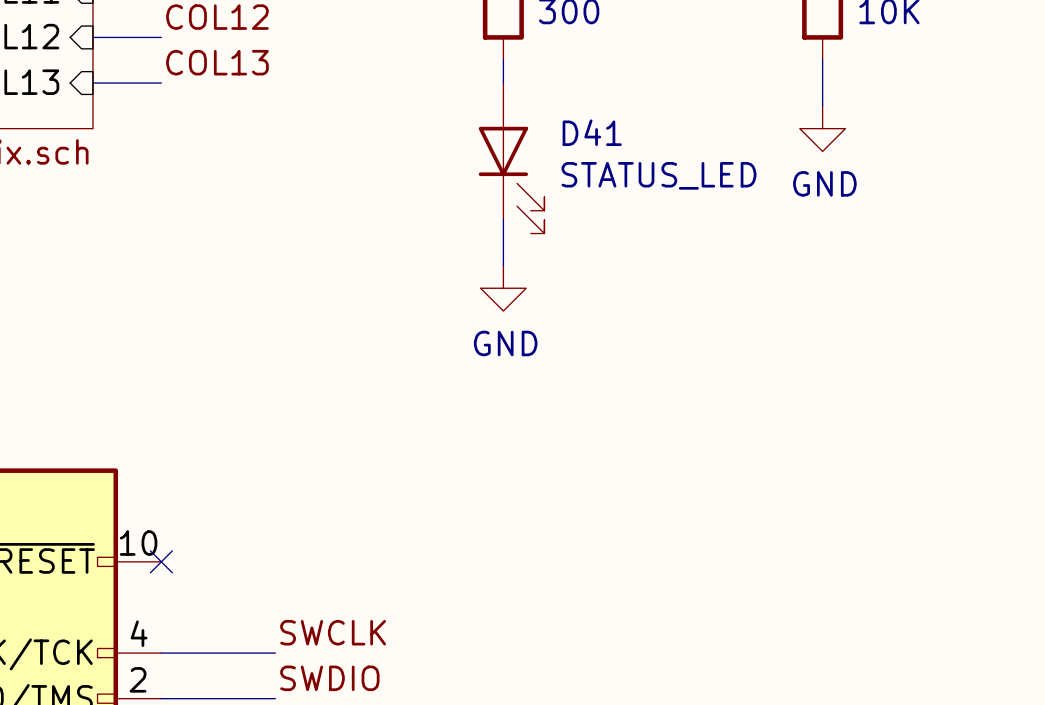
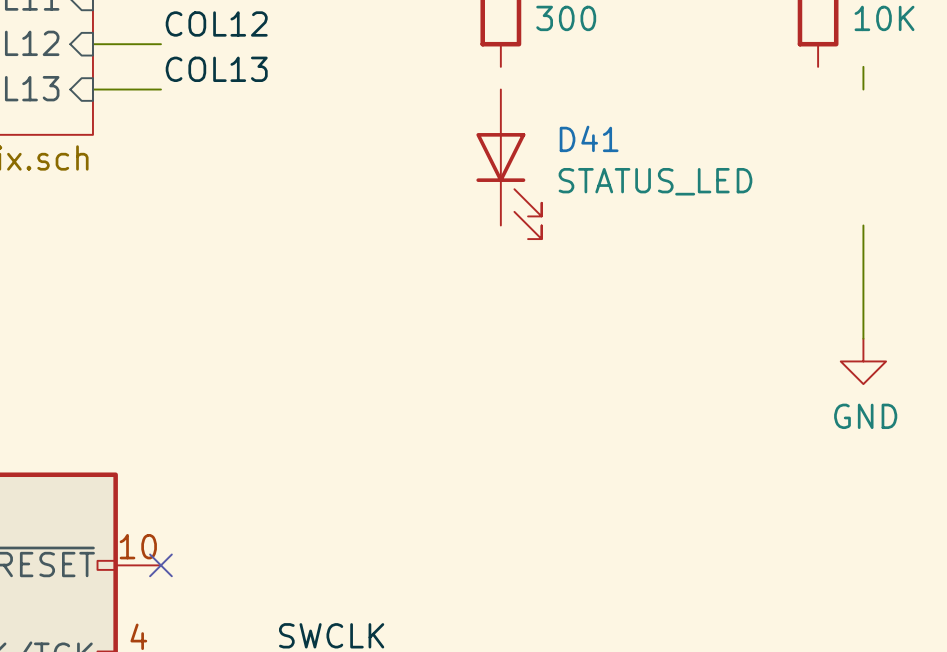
wire: (503, 60) (503, 83) -> (863, 66) (863, 89)
wire: (822, 60) (822, 105) -> none
power symbol: GND (822, 128) -> none
wire: (503, 219) (503, 265) -> none
wire: none -> (863, 225) (863, 338)
power symbol: GND (503, 288) -> none
power symbol: none -> GND (863, 361)

